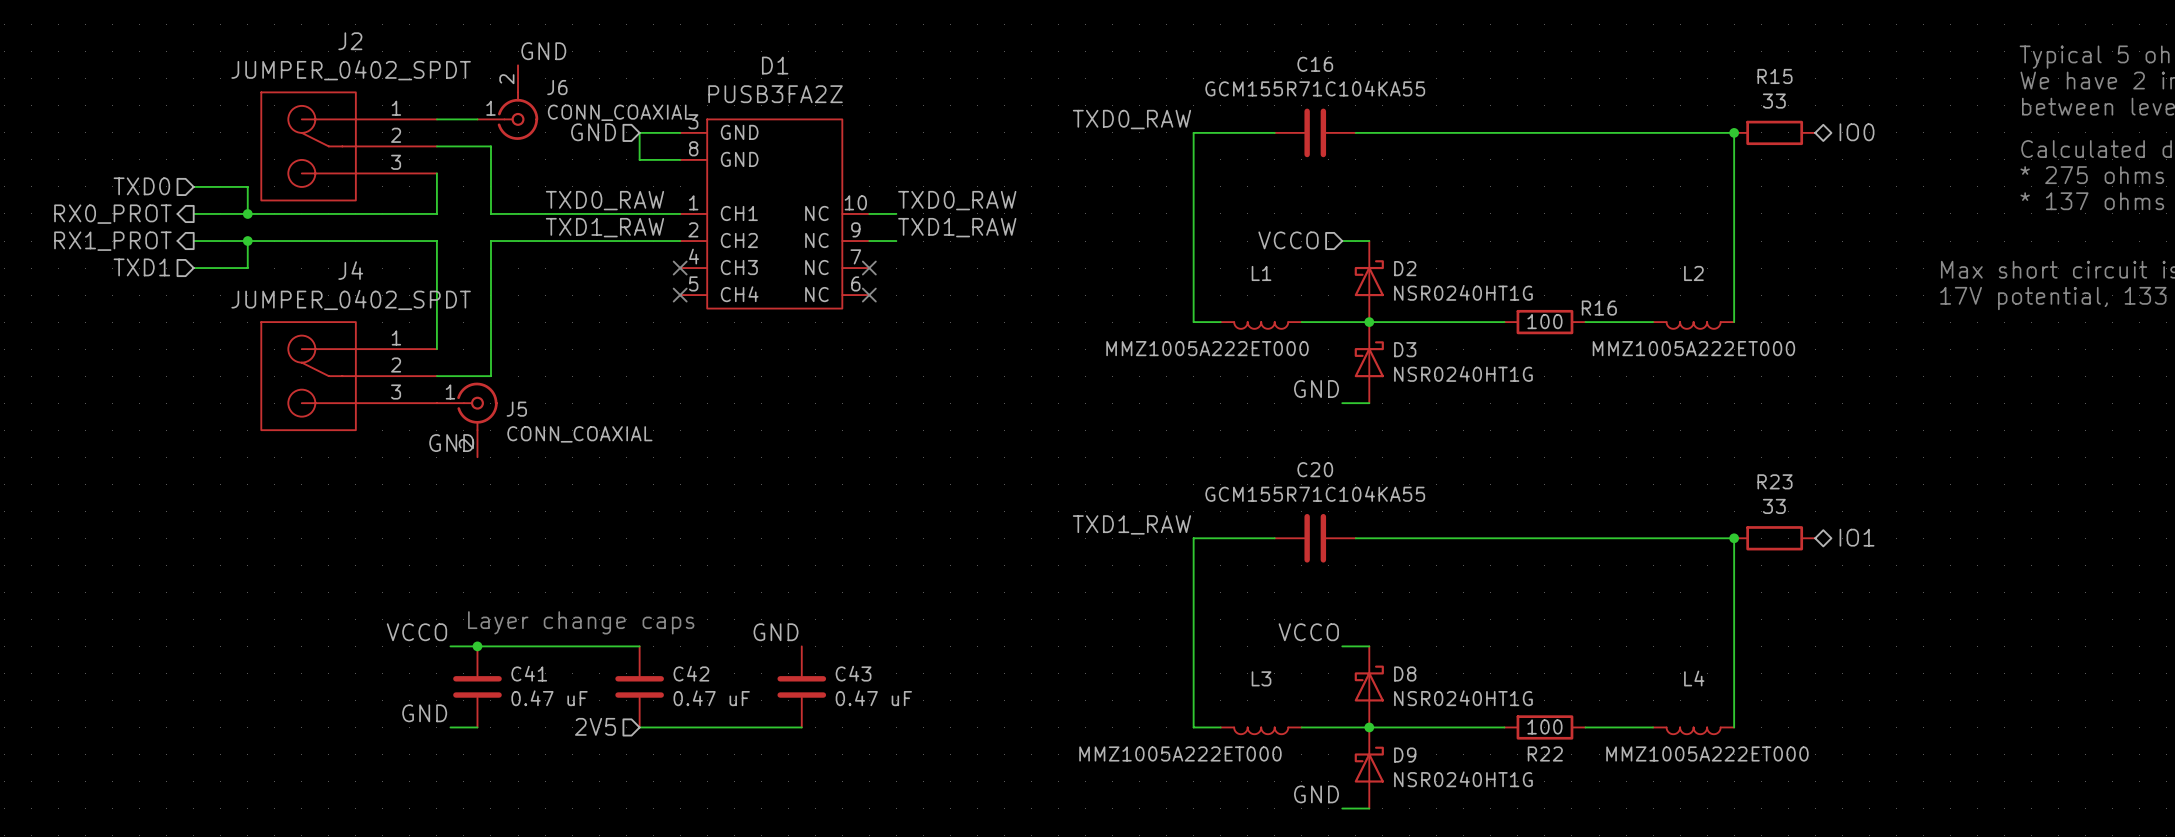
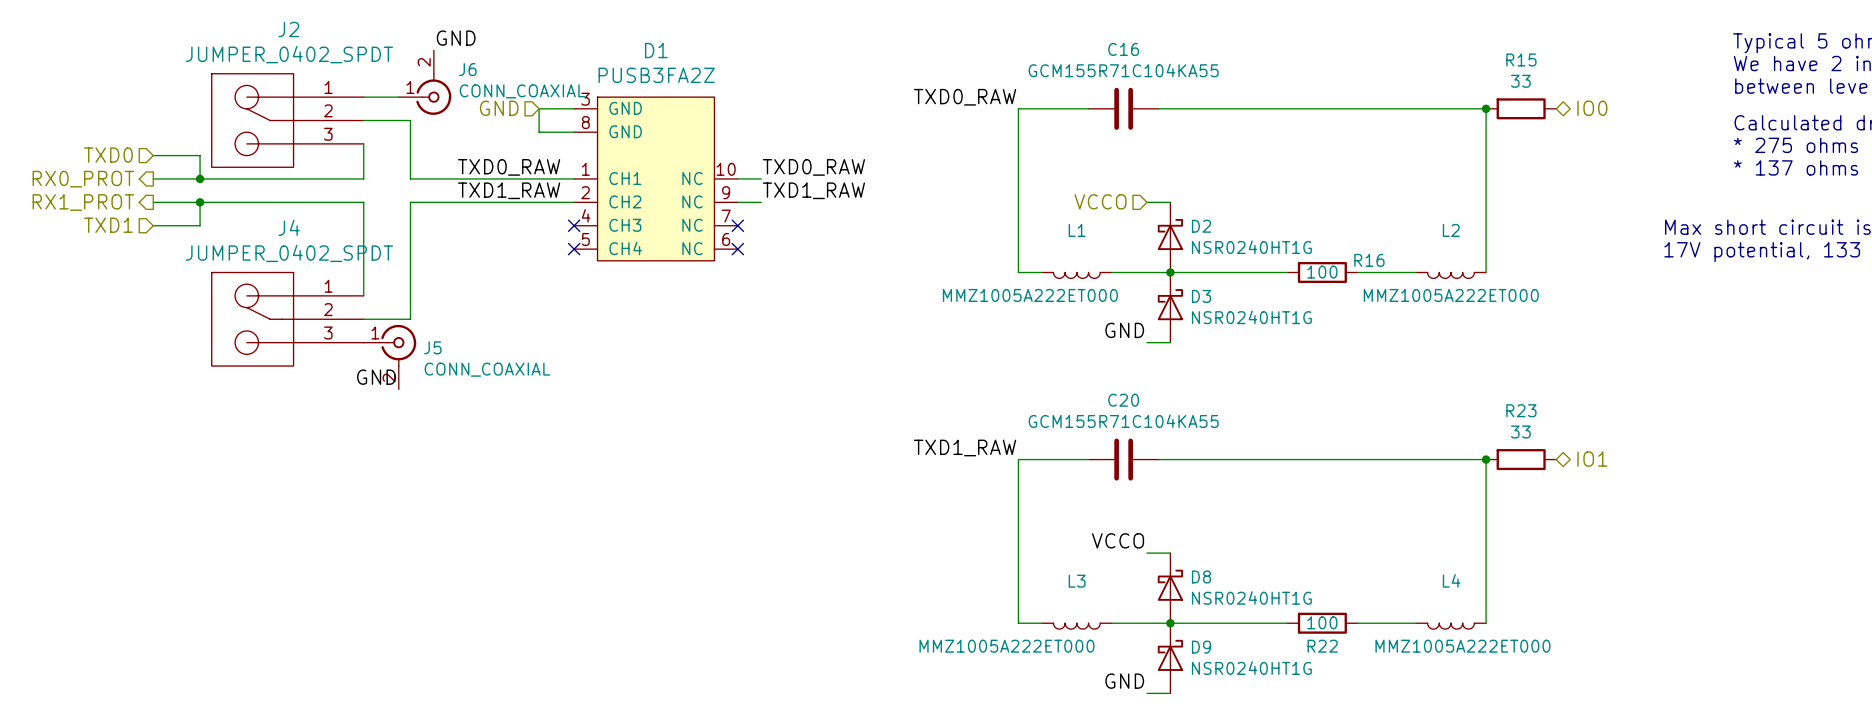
text: Layer change caps (581, 622) -> none
label: VCCO (416, 632) -> none
label: GND (776, 632) -> none
wire: (450, 646) (639, 646) -> none
junction: (477, 646) -> none
C41: 0.47 uF (477, 686) -> none
C42: 0.47 uF (639, 686) -> none
C43: 0.47 uF (801, 686) -> none
label: GND (424, 713) -> none
hierarchical label: 2V5 (595, 726) -> none
wire: (450, 727) (477, 727) -> none
wire: (639, 727) (801, 727) -> none

